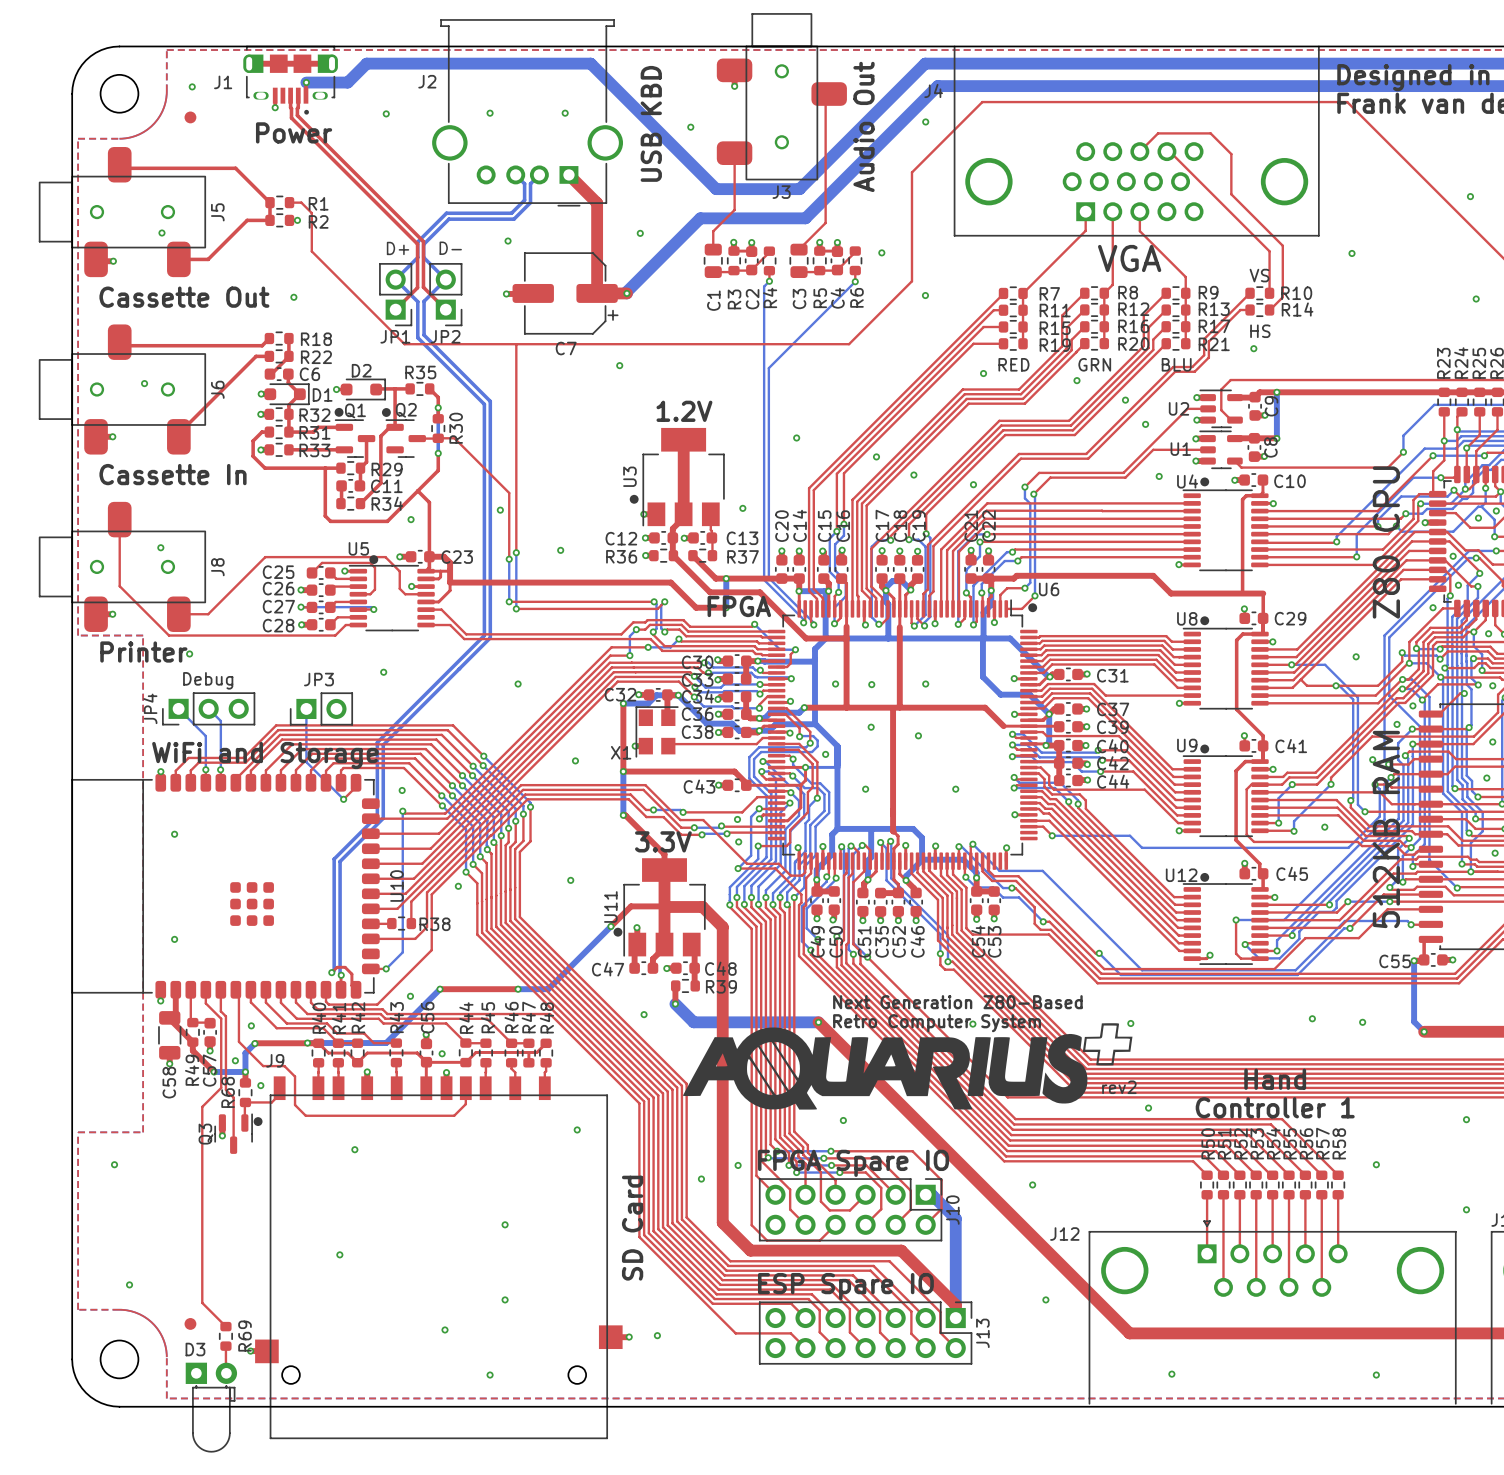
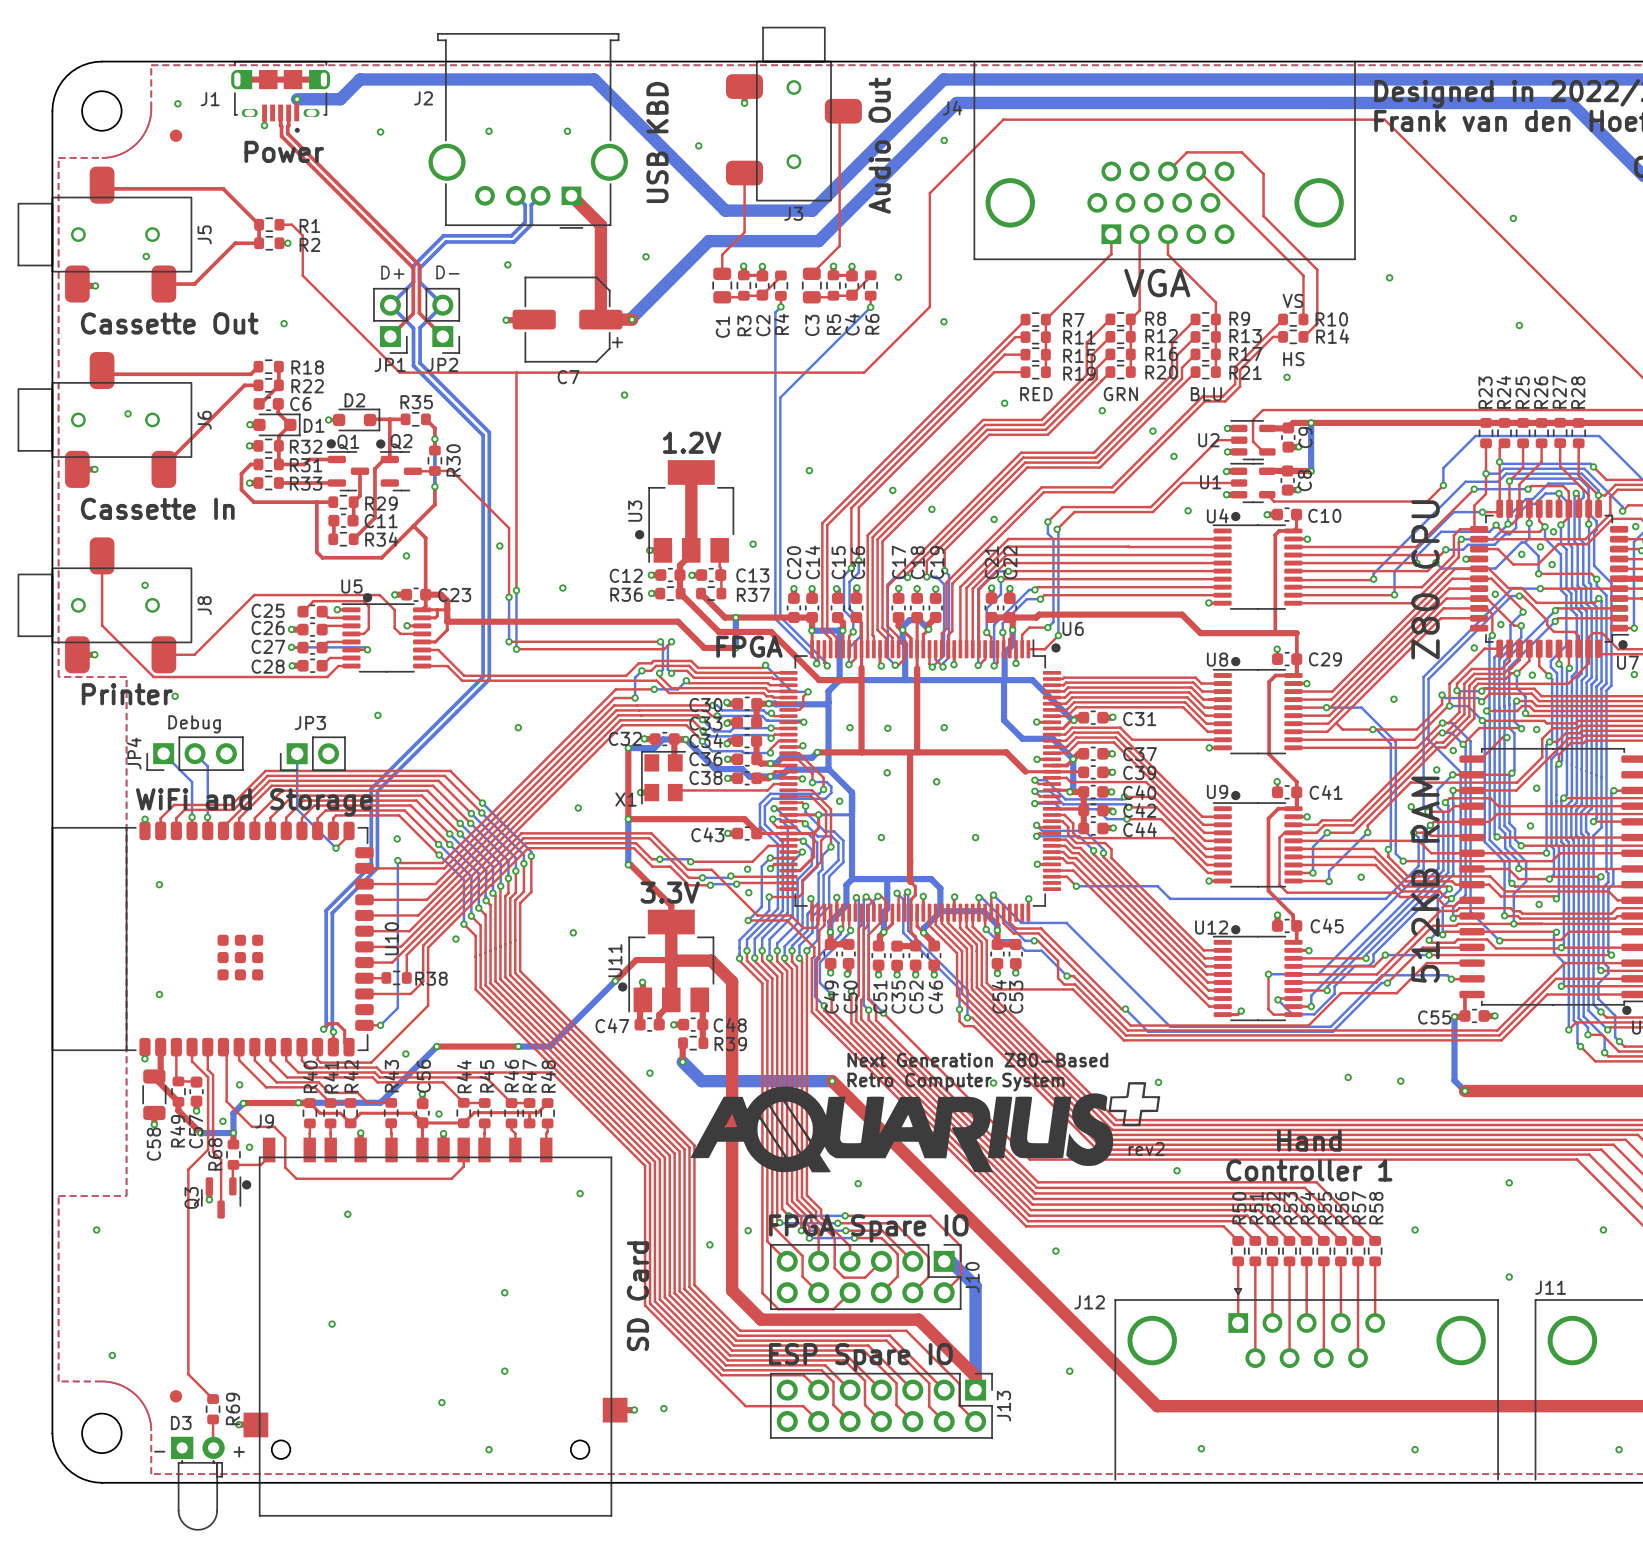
text: none -> - (159, 1451)
text: none -> + (239, 1451)

